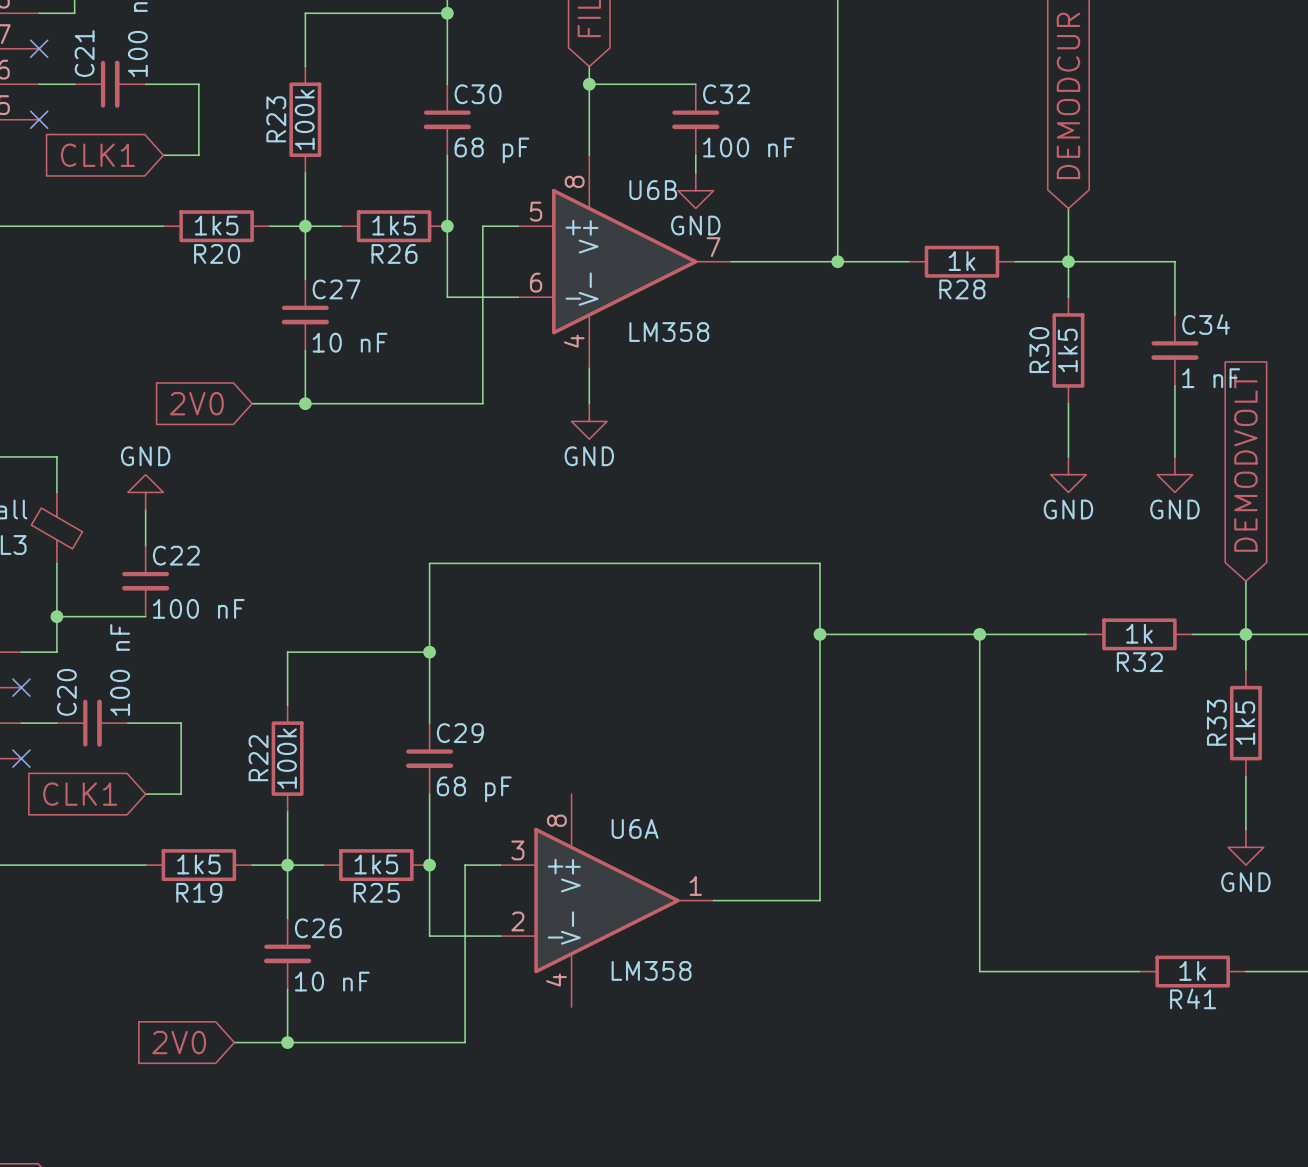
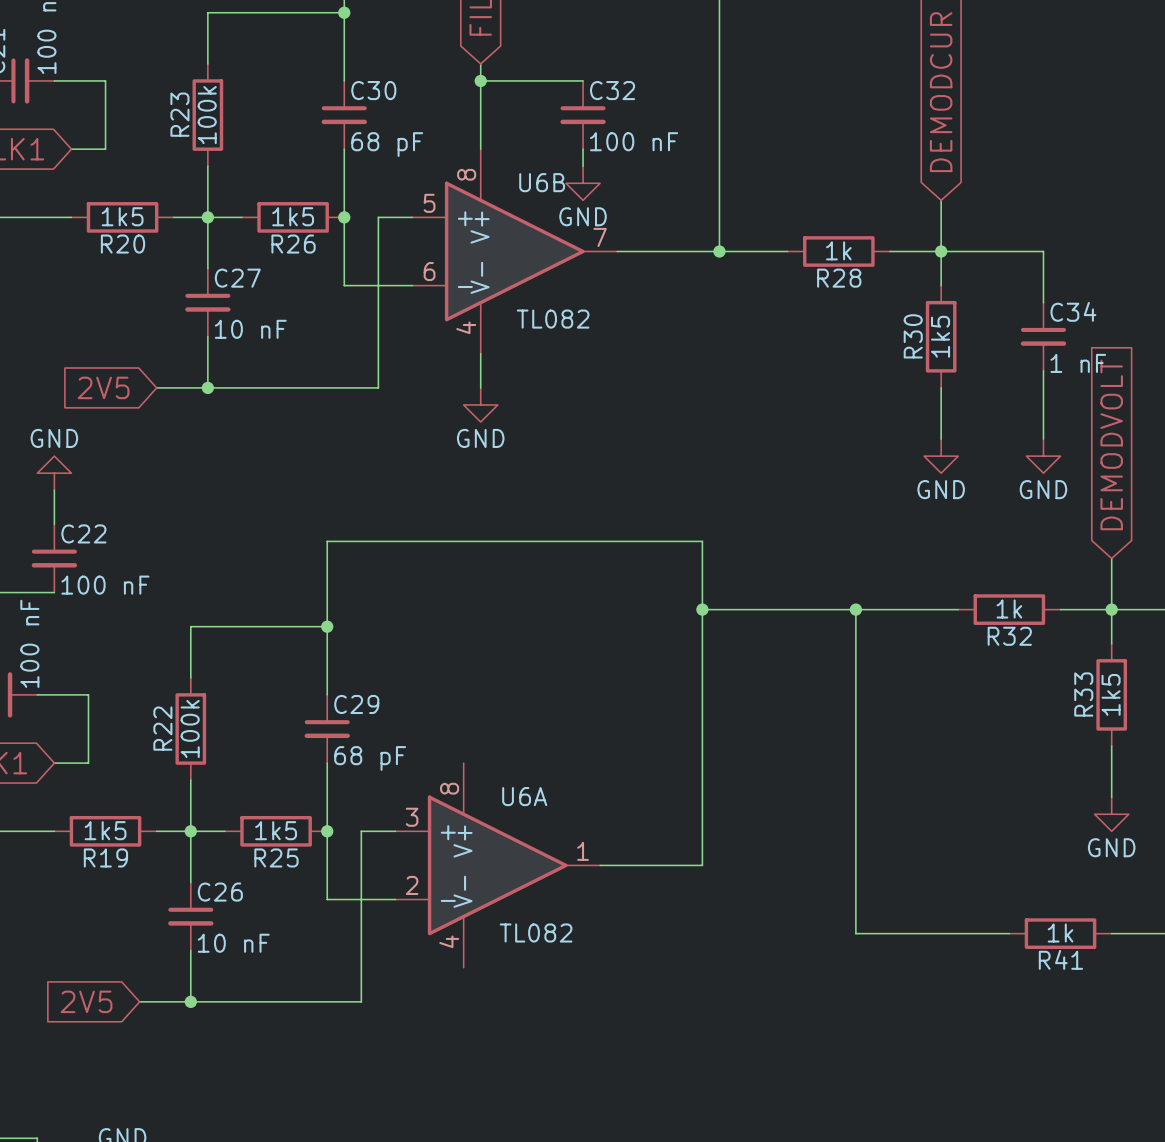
U6B value: LM358 (669, 332) -> TL082 (553, 319)
global label: 2V0 (196, 403) -> 2V5 (103, 387)
U6A value: LM358 (651, 970) -> TL082 (536, 933)
global label: 2V0 (179, 1042) -> 2V5 (86, 1001)

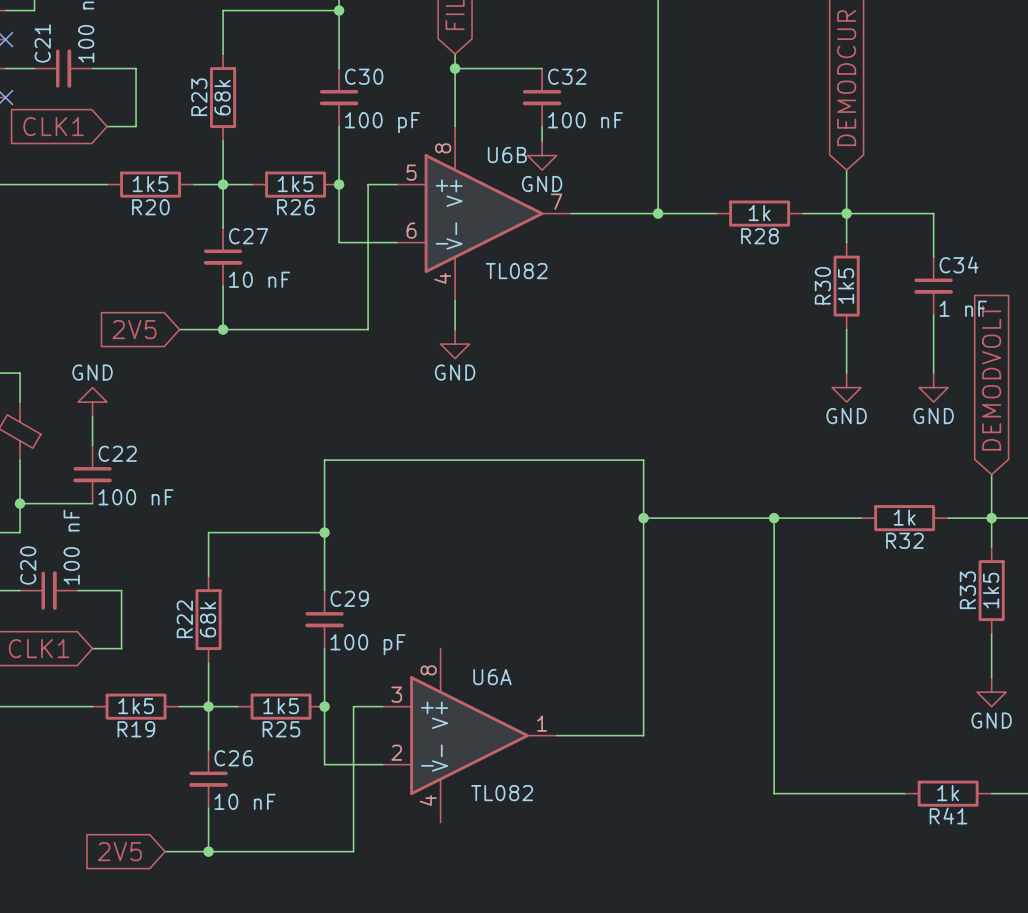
R23 value: 100k (207, 115) -> 68k (222, 97)
C30 value: 68 pF (387, 144) -> 100 pF (382, 122)
R22 value: 100k (190, 729) -> 68k (208, 619)
C29 value: 68 pF (370, 758) -> 100 pF (367, 644)

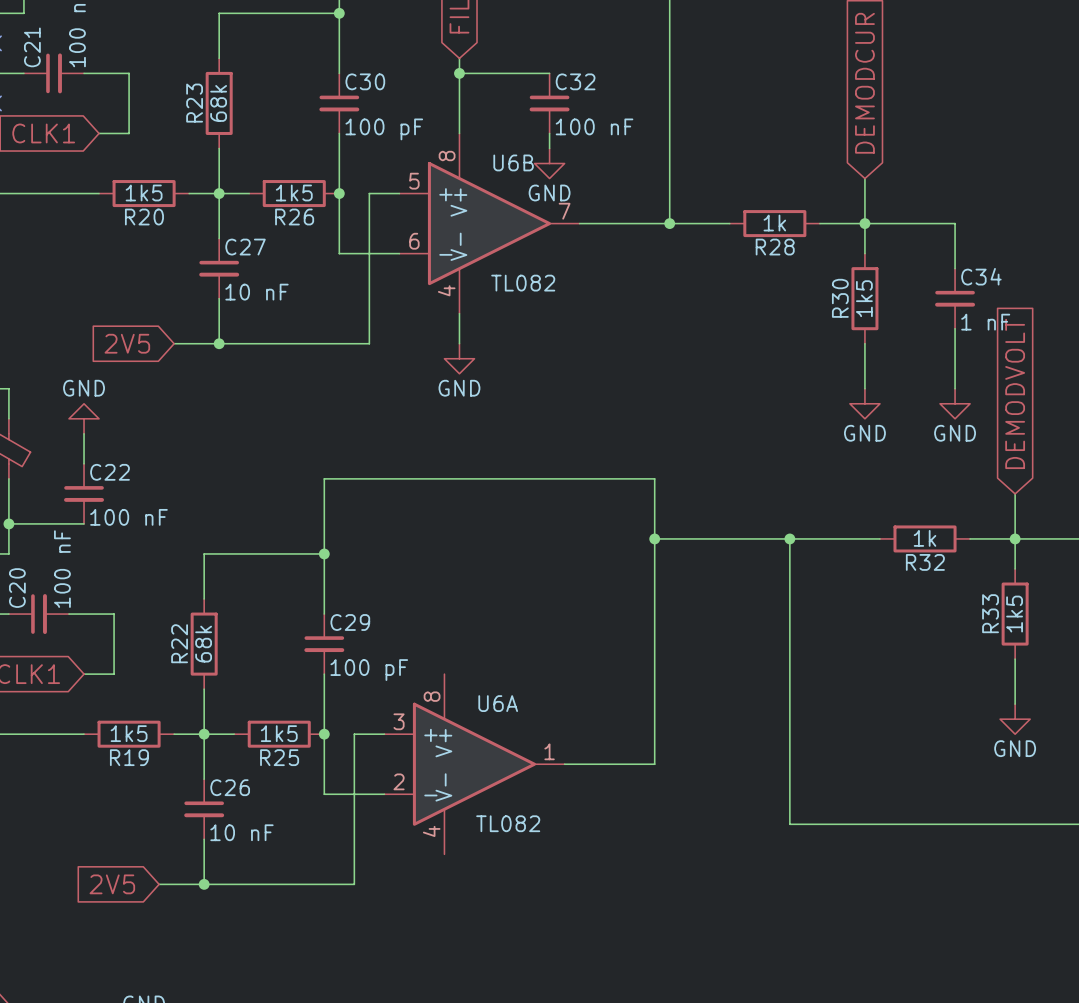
wire: none -> (925, 824) (1015, 824)
R41: 1k (948, 793) -> none

